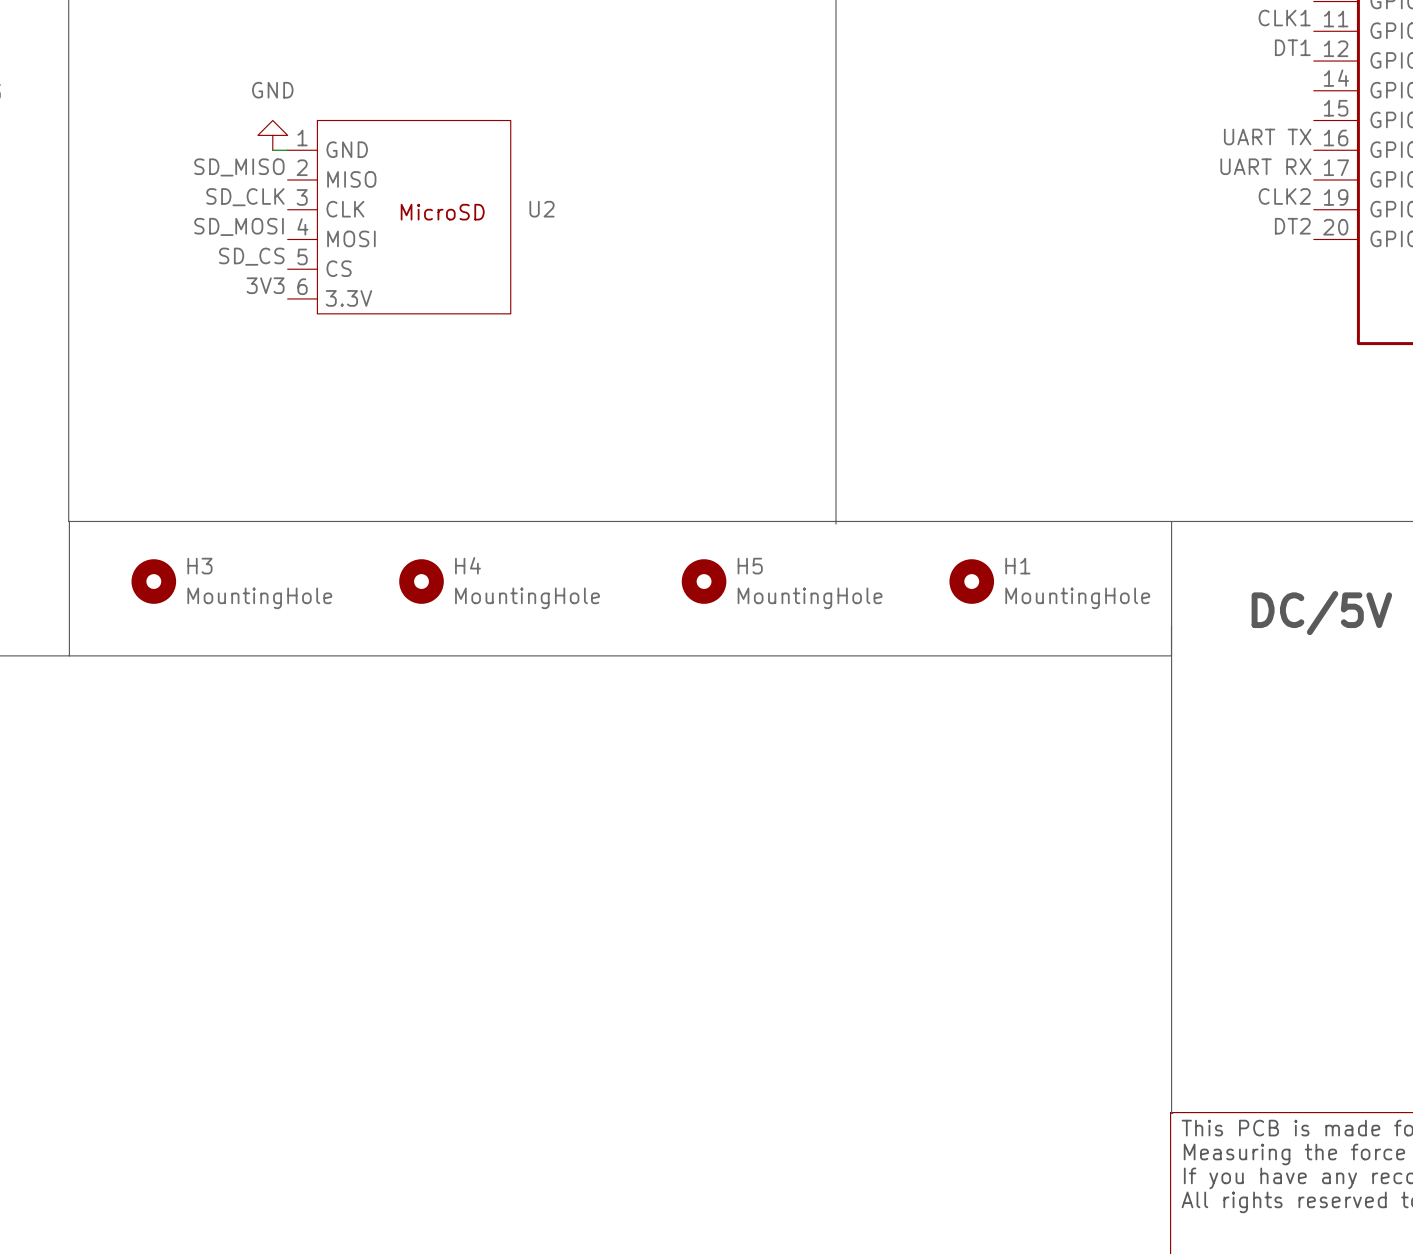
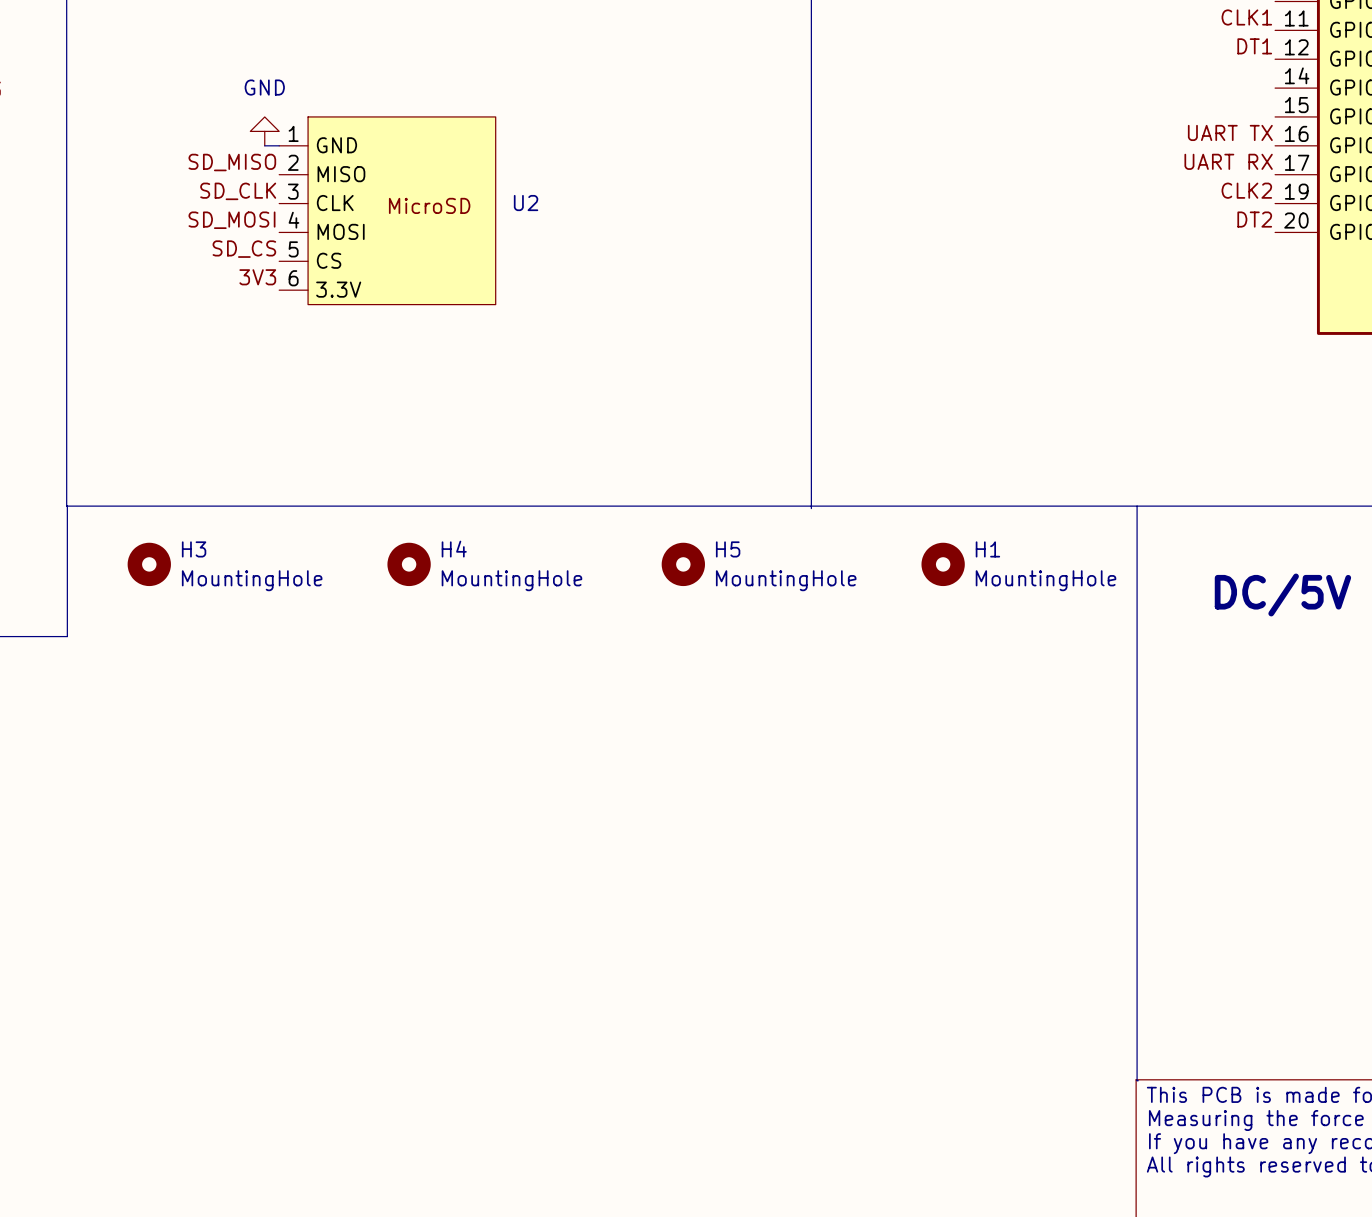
bus: (1171, 625) (1171, 655) (69, 655) -> none

